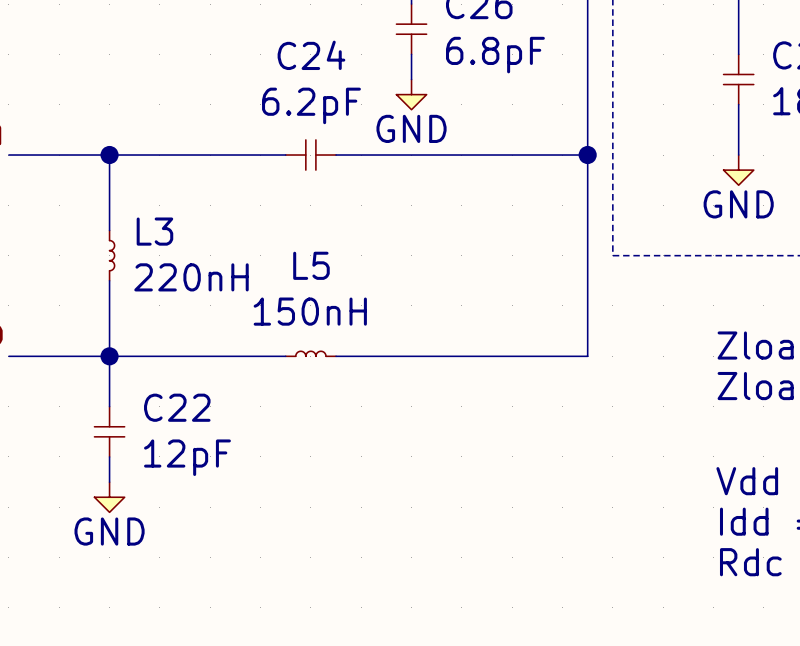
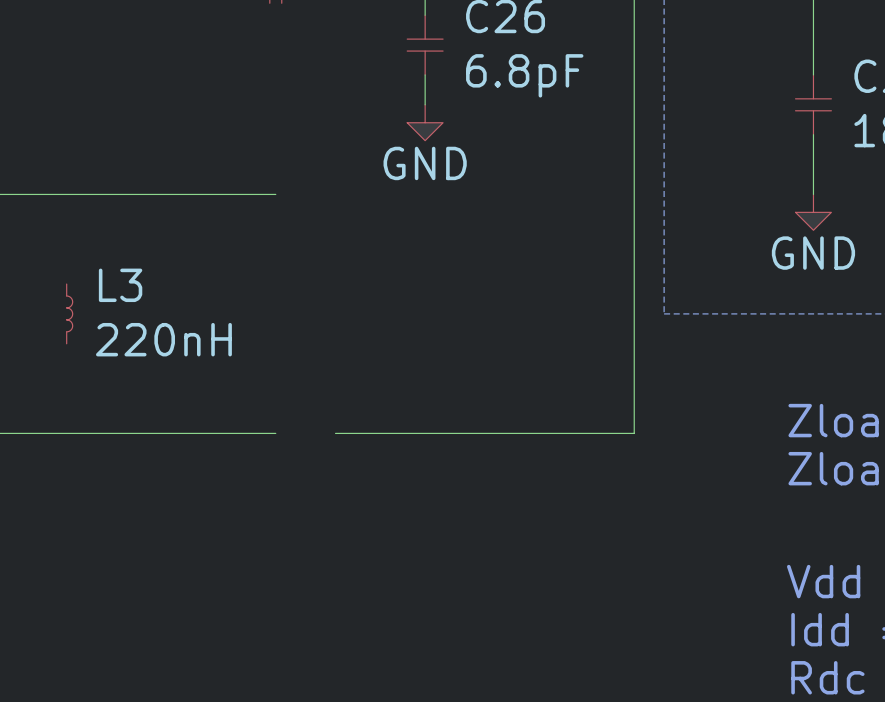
wire: (109, 155) (109, 230) -> none
junction: (109, 155) -> none
C24: 6.2pF (310, 155) -> none
wire: (336, 155) (587, 155) -> none
junction: (587, 155) -> none
wire: (109, 280) (109, 406) -> none
L5: 150nH (310, 353) -> none
junction: (109, 356) -> none
C22: 12pF (109, 431) -> none
wire: (109, 456) (109, 482) -> none
power symbol: GND (109, 497) -> none

